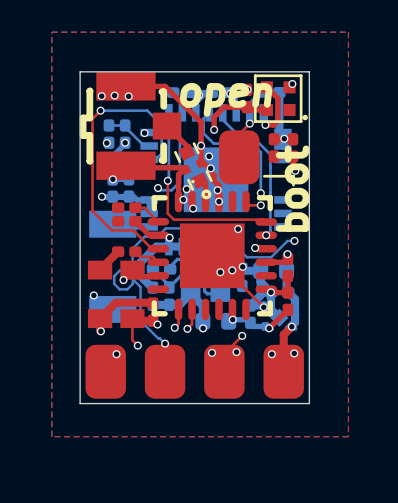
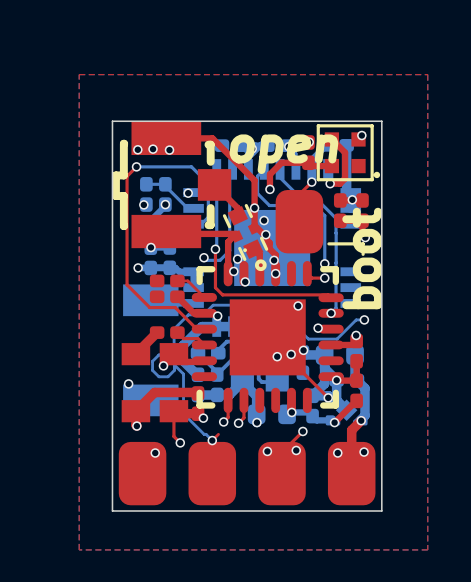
top track: none -> (218, 434) (212, 440)

